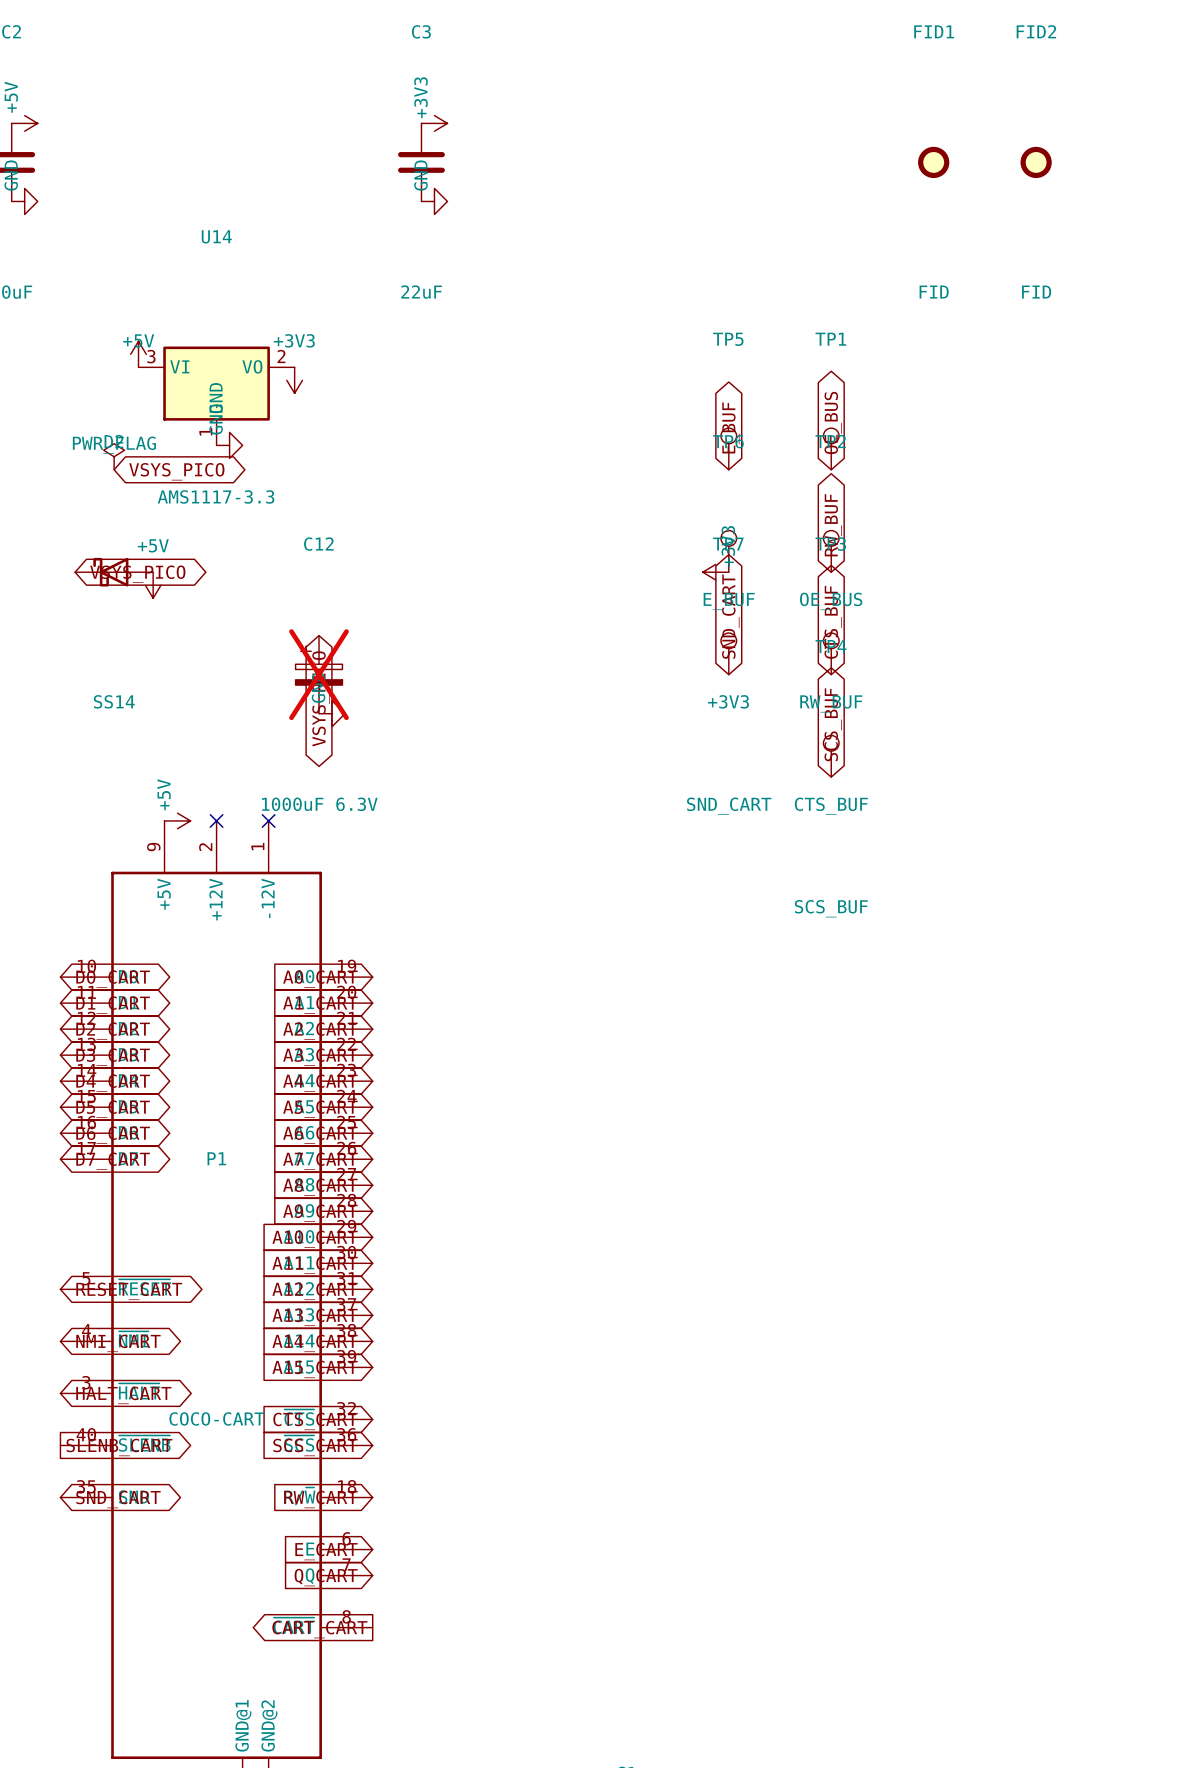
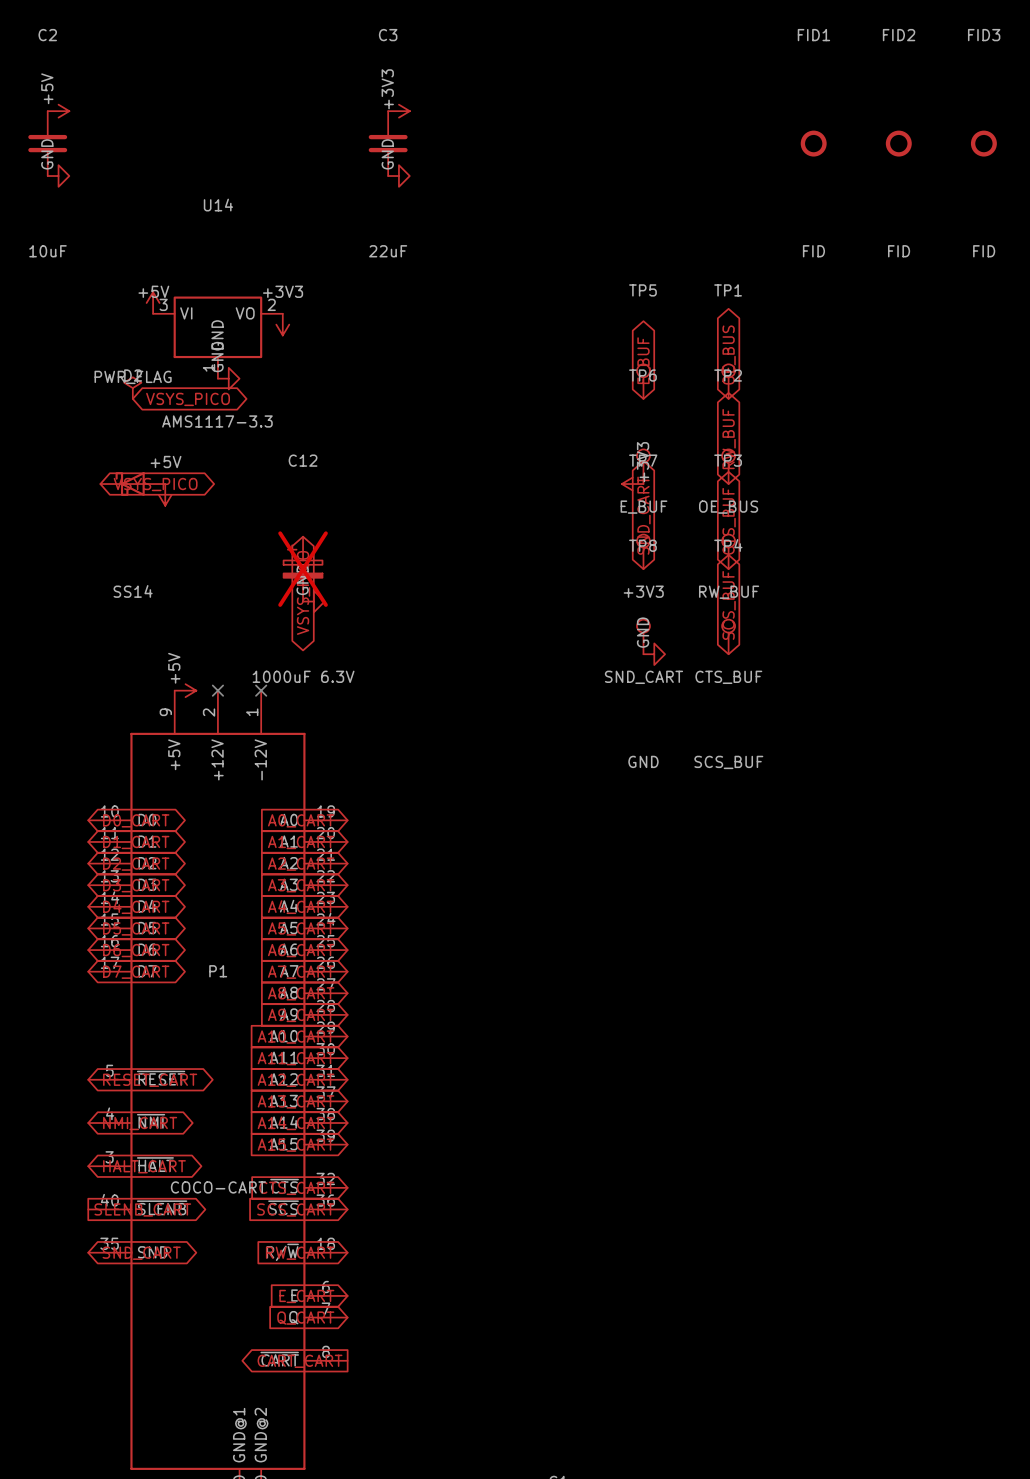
FID3: none -> FID (983, 143)
TP8: none -> GND (643, 636)
power symbol: none -> GND (654, 654)

